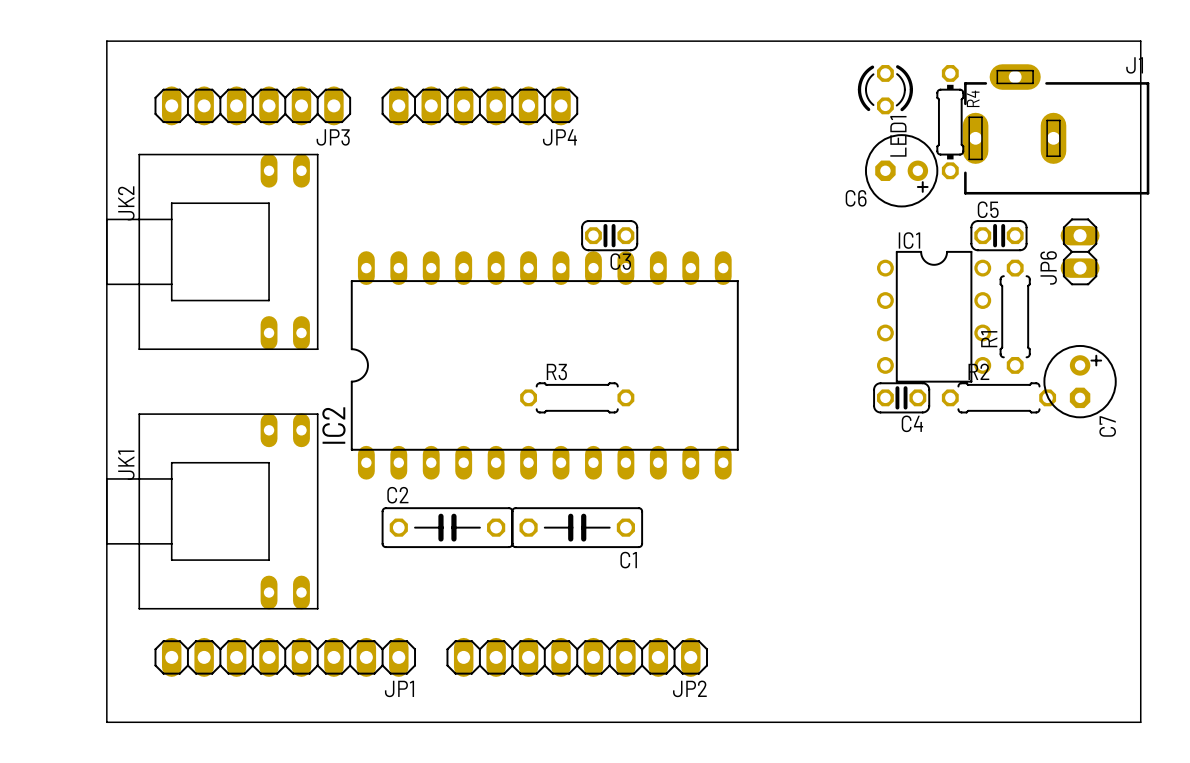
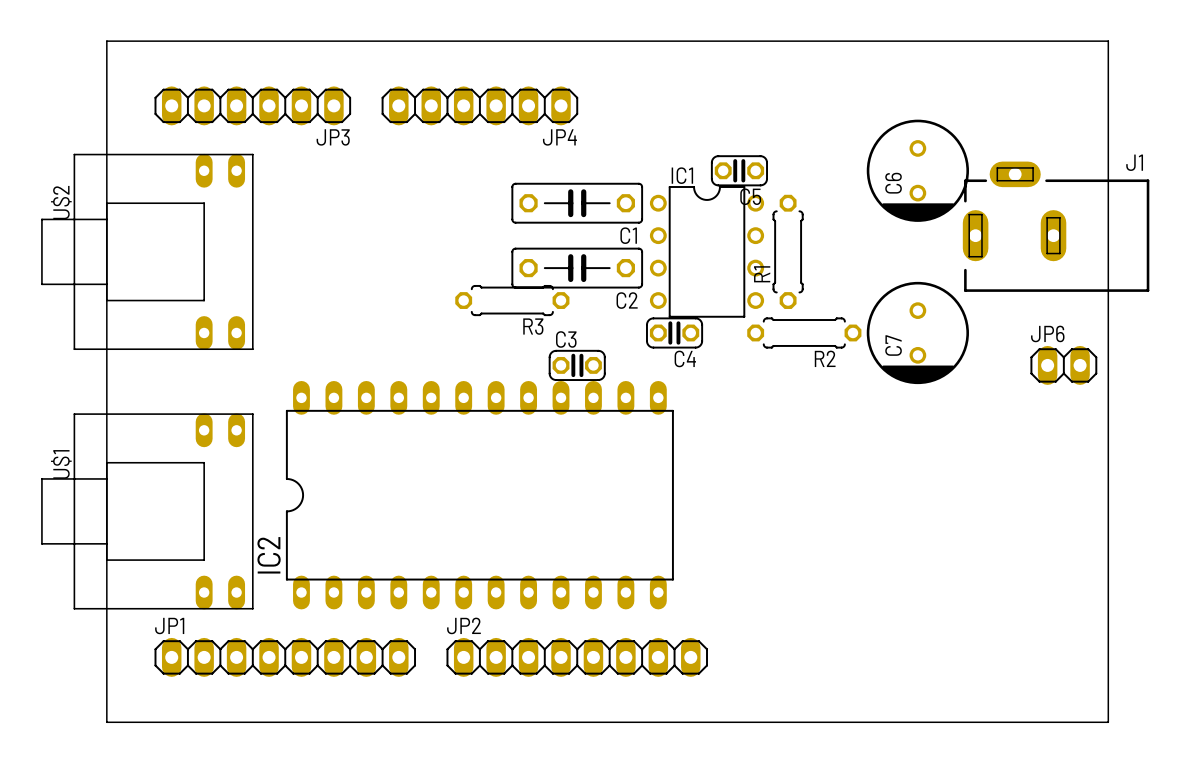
board edge: (1108, 41) (1140, 41) (1140, 722) (1108, 722) -> (1108, 41) (1108, 722)
LED1: (885, 89) -> none
R4: (950, 122) -> none
J1 position: (1056, 129) -> (1056, 226)
C6 footprint: [864, 134, 939, 208] -> [866, 119, 969, 222]
C6 name position: C6 (856, 198) -> C6 (893, 183)
C3 rotation: 0° (609, 235) -> 180° (577, 365)
C3 position: (609, 235) -> (577, 365)
C5 rotation: 0° (998, 235) -> 180° (739, 170)
C5 position: (998, 235) -> (739, 170)
U$2: none -> (147, 251)
JK2: (212, 251) -> none
JP6 rotation: 0° (1080, 251) -> 90° clockwise (1063, 365)
JP6 position: (1080, 251) -> (1063, 365)
IC1 position: (934, 316) -> (707, 251)
R1 position: (1015, 316) -> (788, 251)
C7 footprint: [1043, 344, 1117, 419] -> [866, 281, 969, 385]
IC2 position: (544, 365) -> (479, 495)
R2 name position: R2 (978, 371) -> R2 (825, 358)
R3 name position: R3 (556, 372) -> R3 (533, 326)
R3 position: (577, 397) -> (512, 300)
C4 position: (901, 397) -> (674, 332)
R2 position: (998, 397) -> (804, 332)
C7 name position: C7 (1107, 426) -> C7 (893, 345)
C2 name position: C2 (397, 495) -> C2 (627, 300)
U$1: none -> (147, 511)
JK1: (212, 511) -> none
C2 position: (447, 527) -> (577, 268)
C1 position: (577, 527) -> (577, 203)
JP1 name position: JP1 (399, 688) -> JP1 (169, 626)
JP2 name position: JP2 (689, 688) -> JP2 (463, 625)

